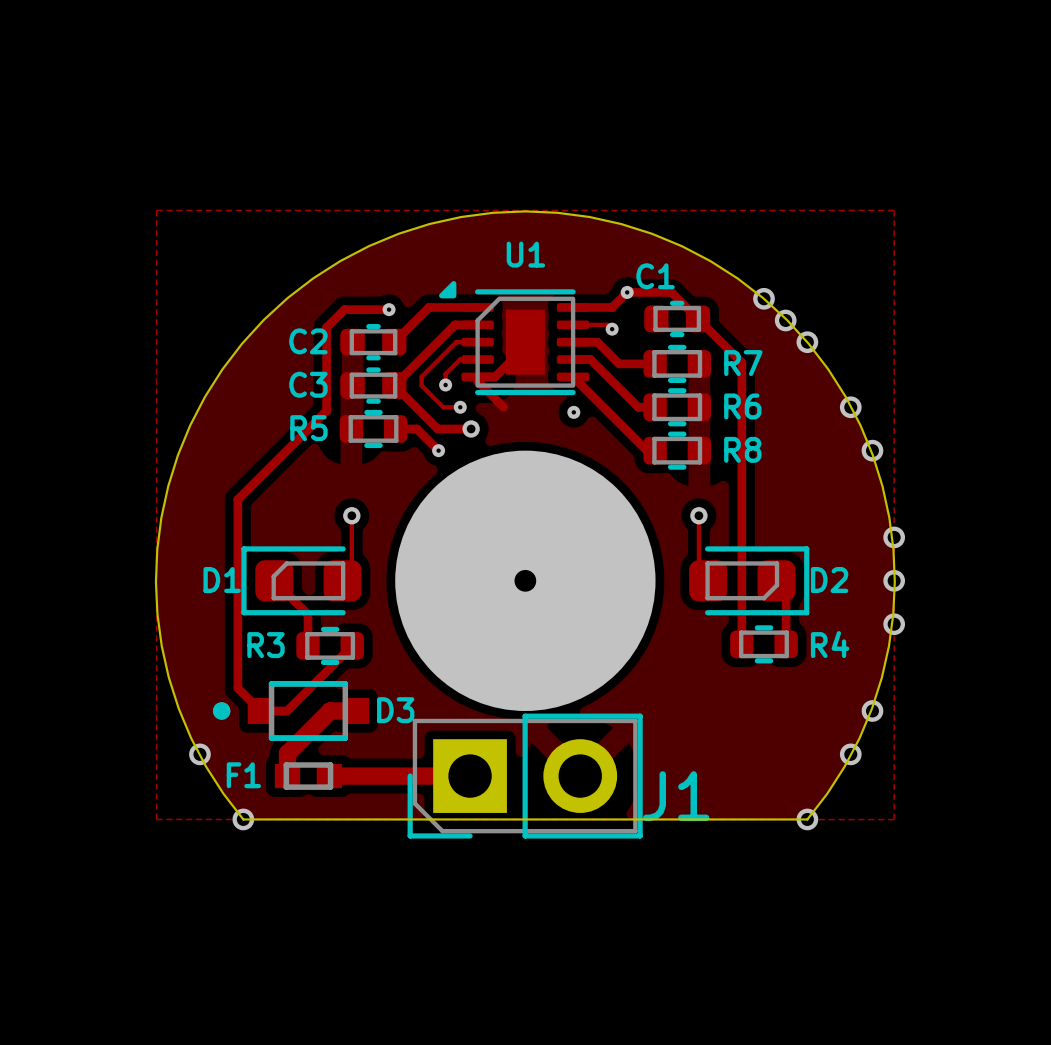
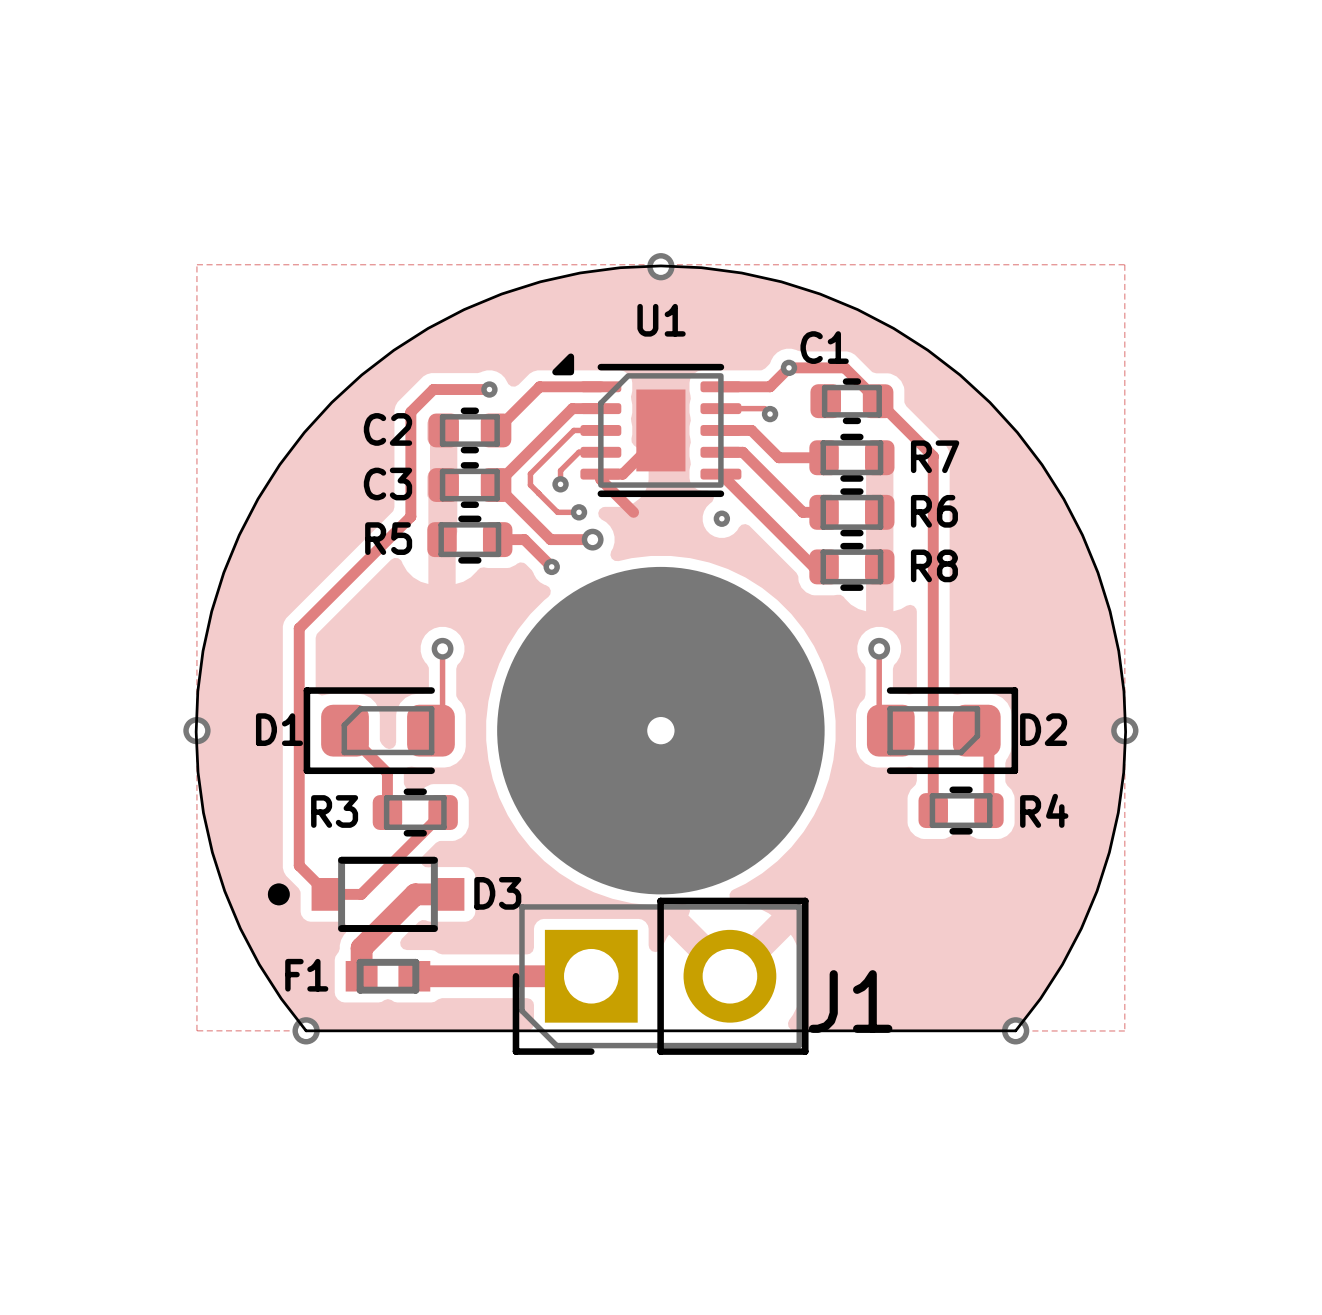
via: none -> (660, 266)
via: (764, 298) -> none
via: (785, 320) -> none
via: (807, 342) -> none
via: (850, 407) -> none
via: (872, 450) -> none
via: (894, 537) -> none
via: (894, 624) -> none
via: (872, 710) -> none
via position: (199, 754) -> (196, 730)
via: (850, 754) -> none

